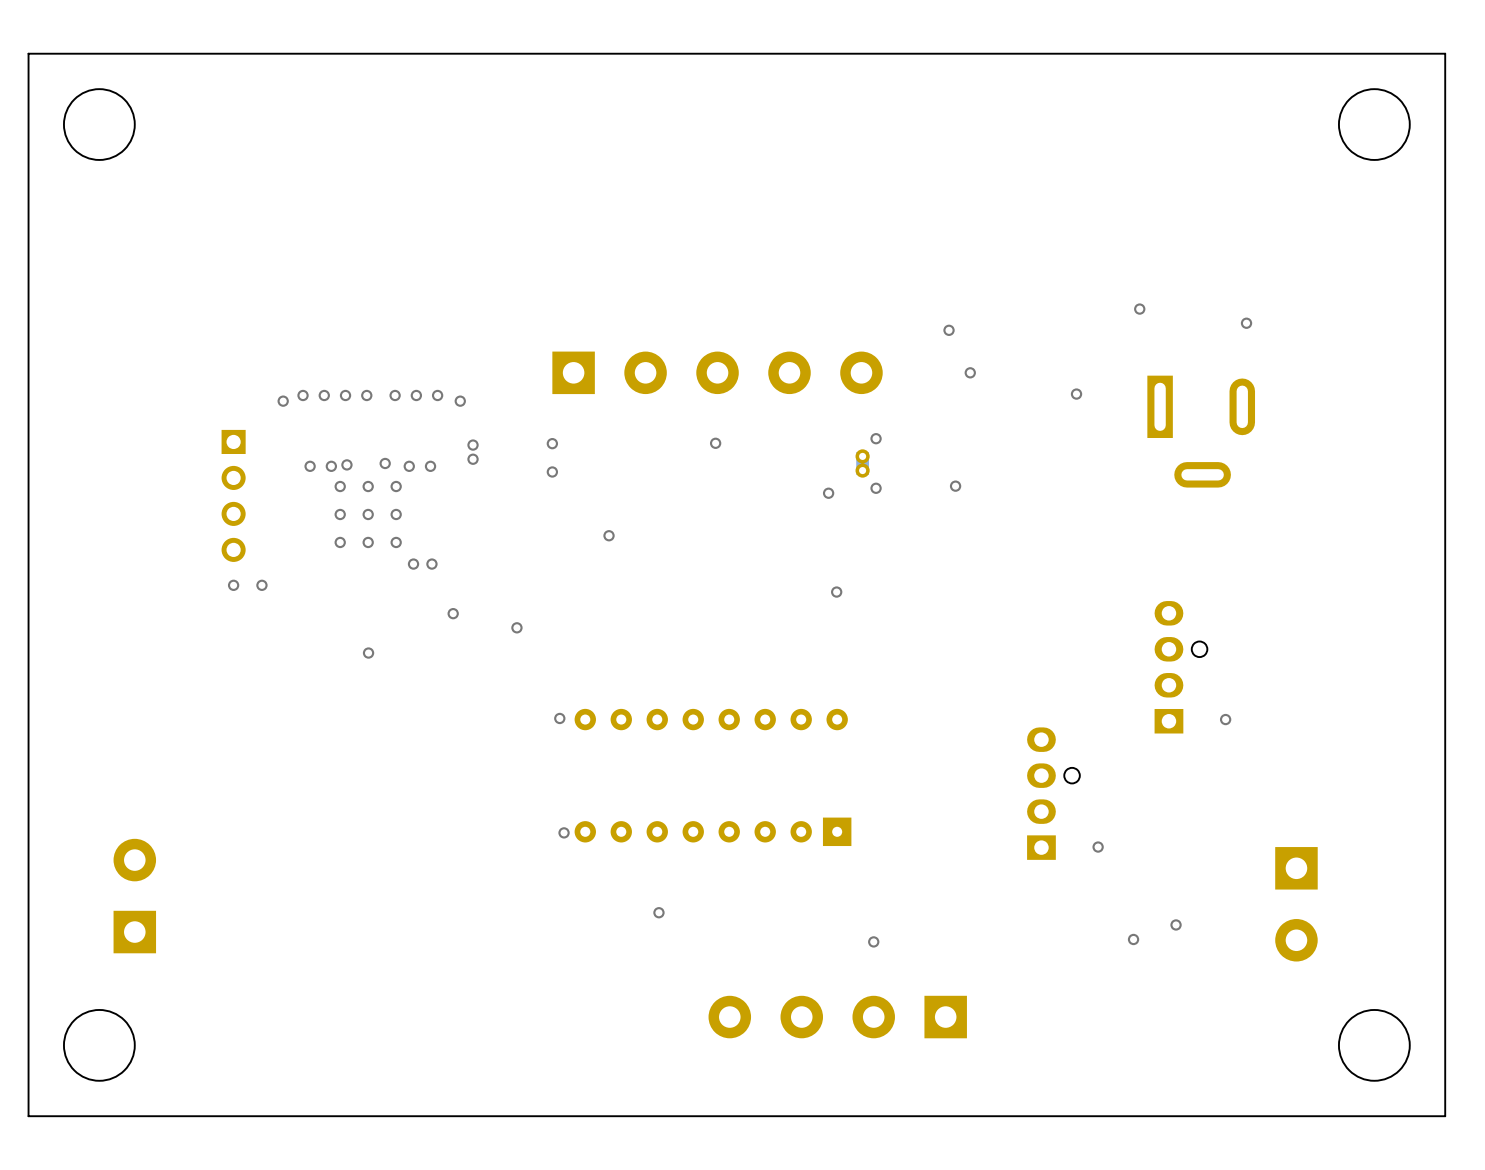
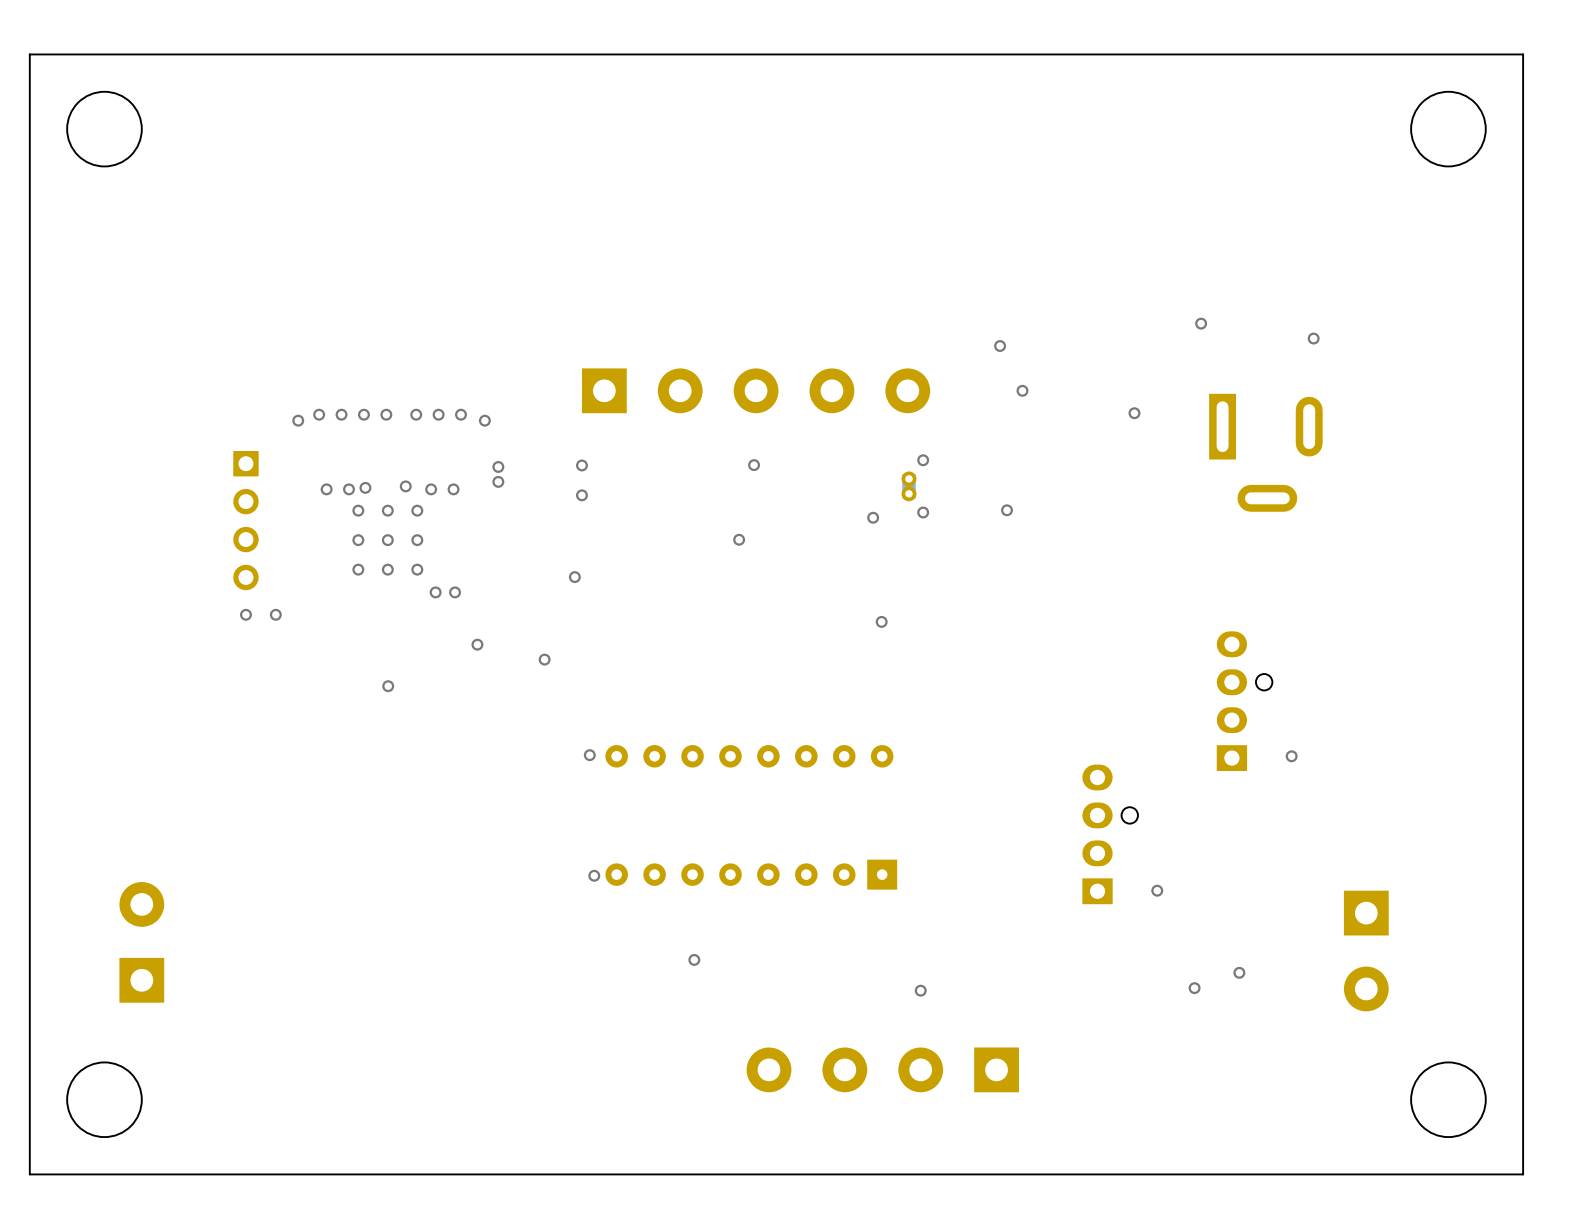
via: none -> (739, 539)
via: (609, 535) -> none
via: none -> (574, 577)

